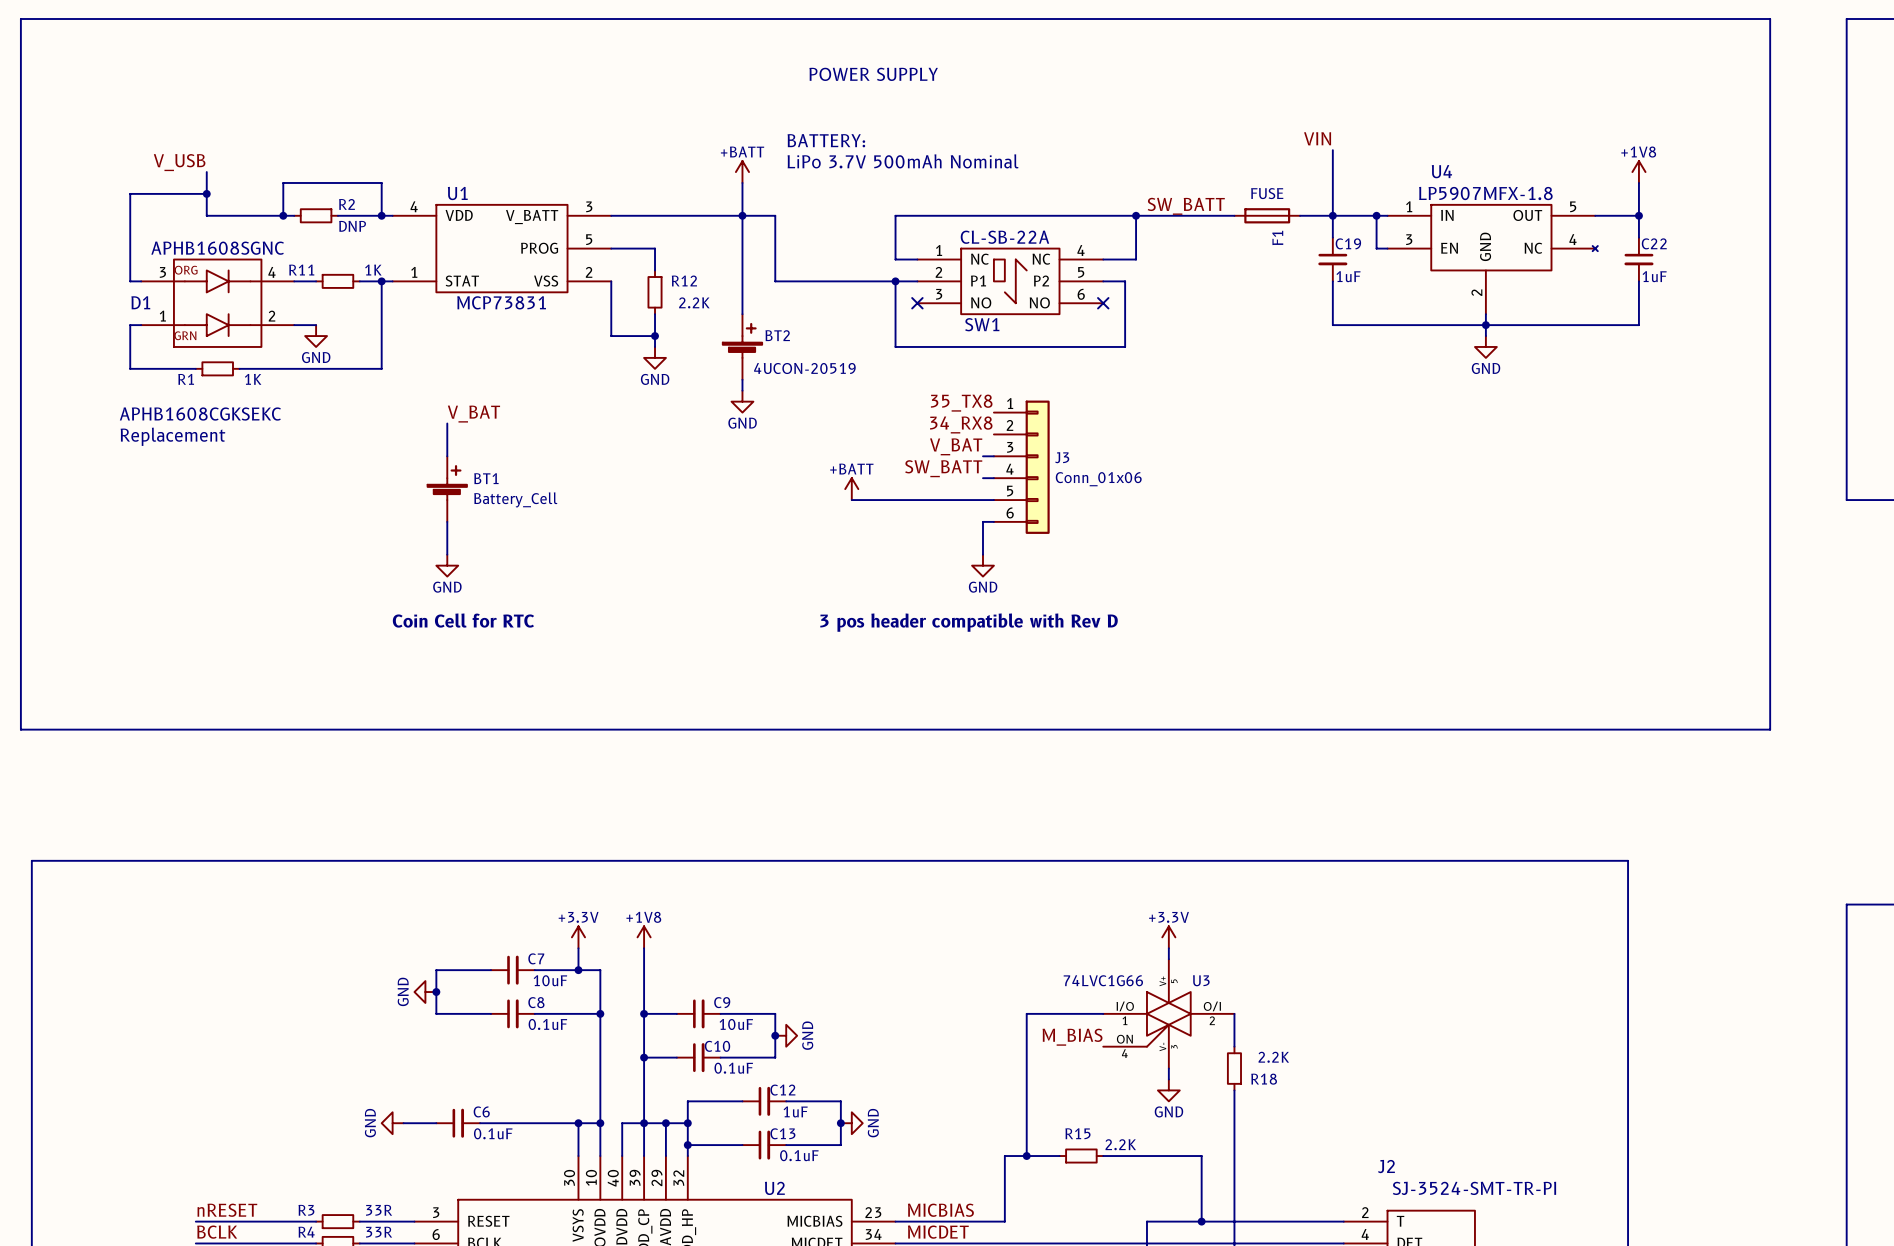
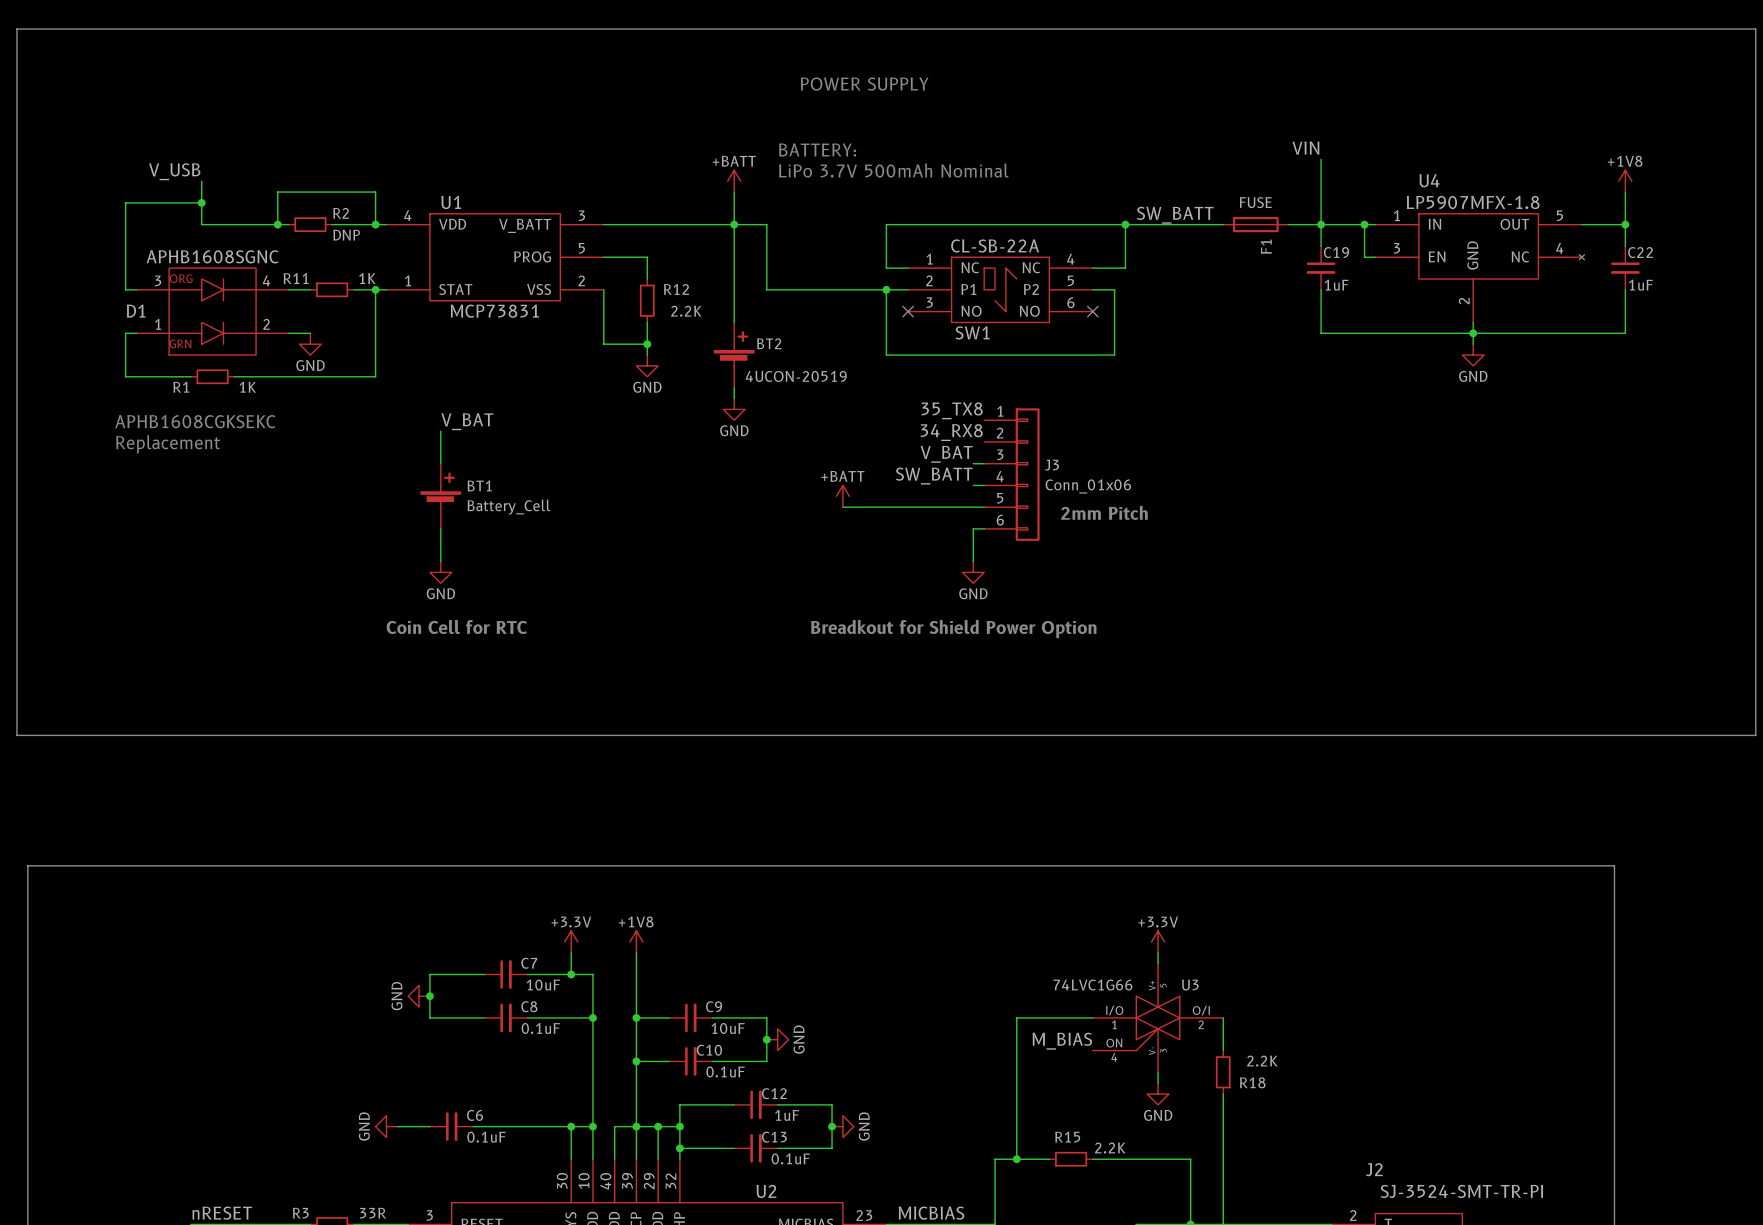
text: none -> 2mm Pitch (1104, 512)
text: 3 pos header compatible with Rev D (969, 622) -> Breadkout for Shield Power Option (953, 629)

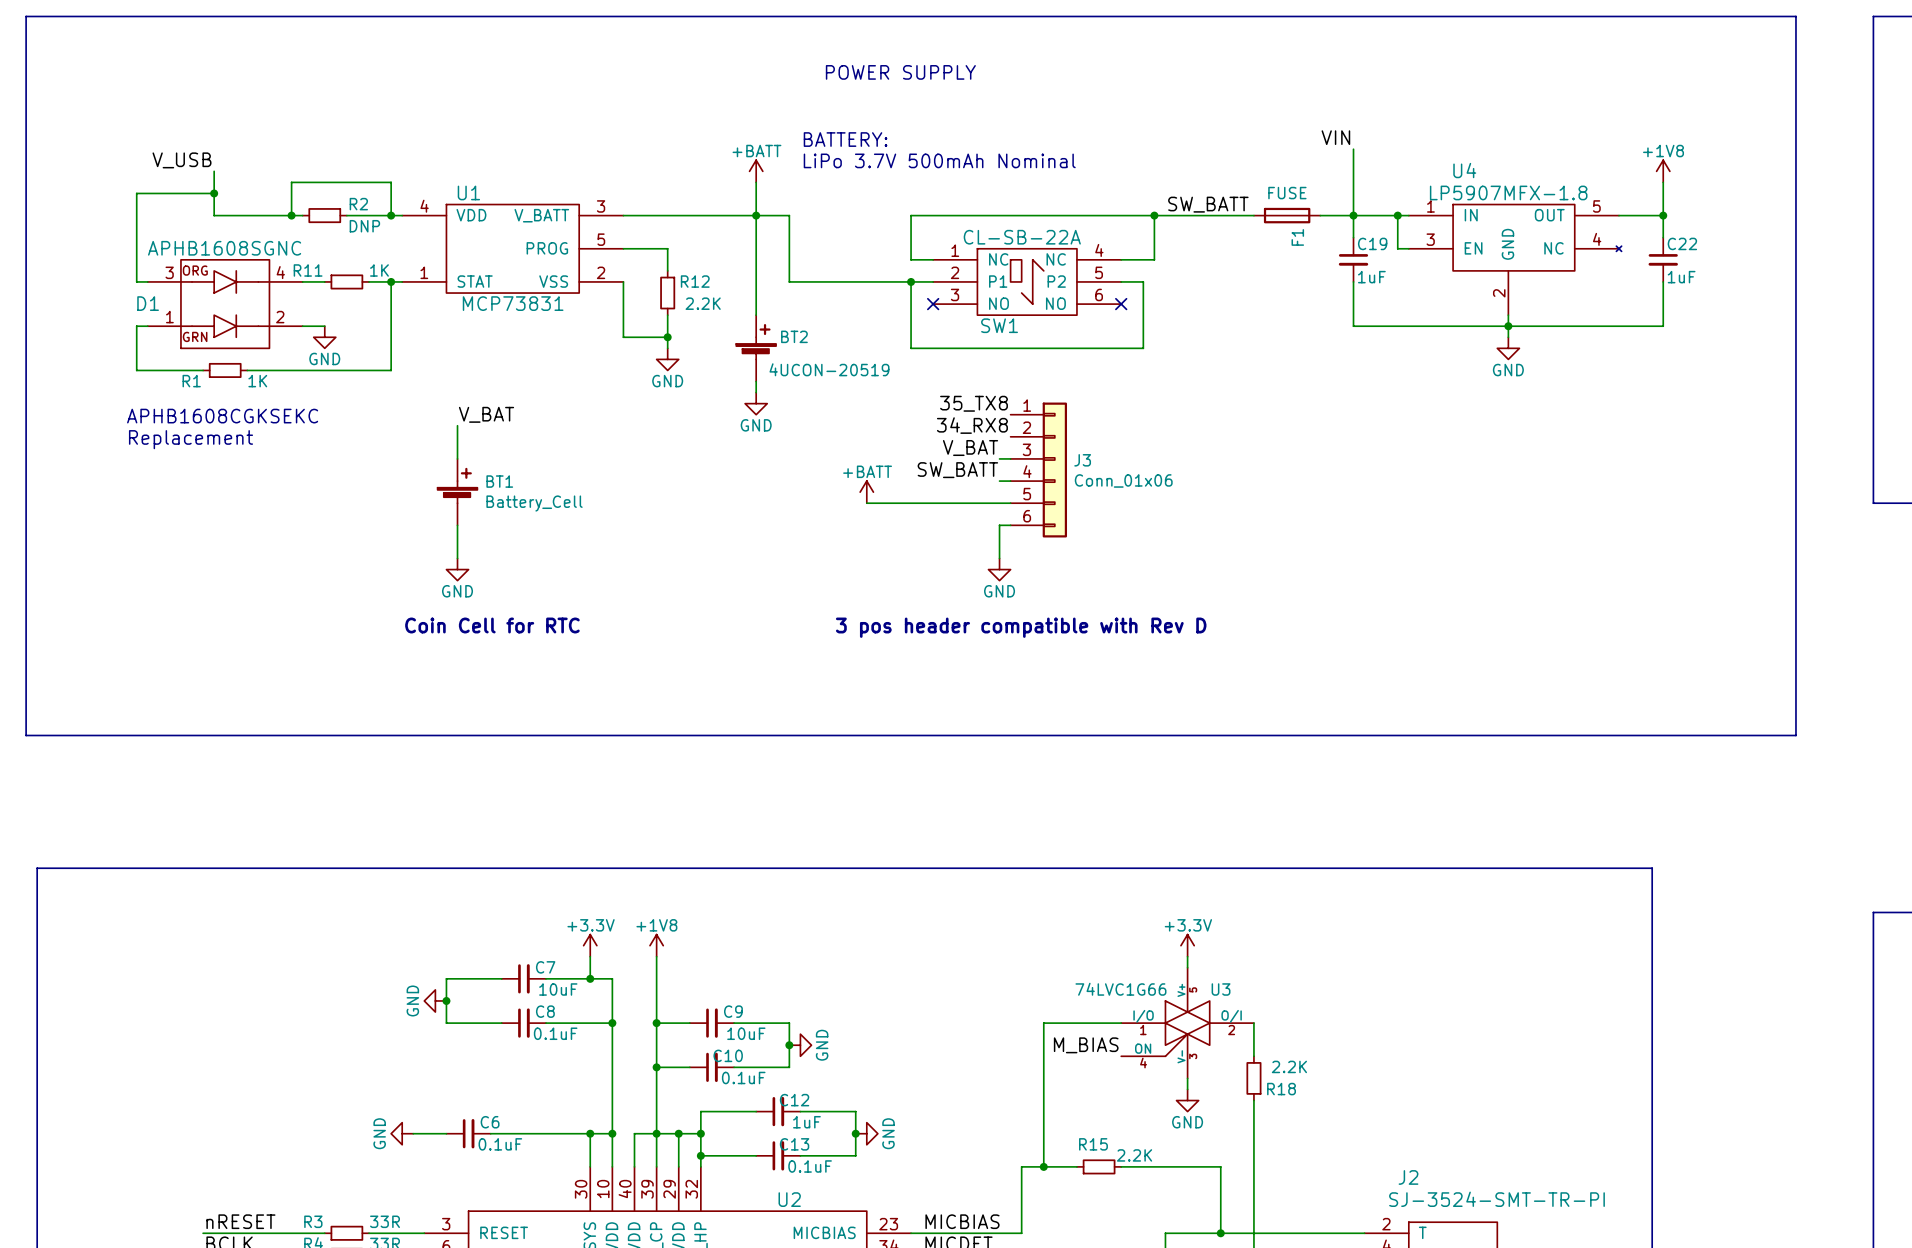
text: 2mm Pitch (1104, 512) -> none
text: Breadkout for Shield Power Option (953, 629) -> 3 pos header compatible with Rev D (1021, 627)

